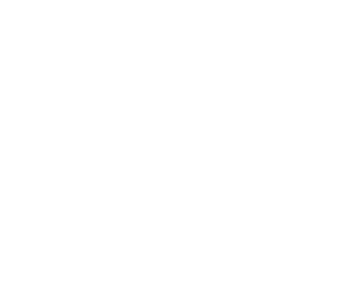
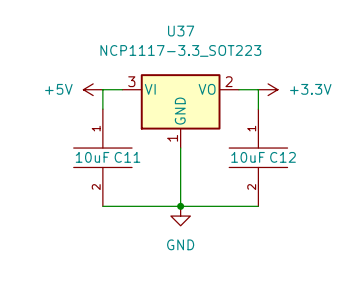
power symbol: none -> +5V (93, 89)
wire: none -> (122, 89) (102, 89) (102, 109)
wire: none -> (238, 89) (258, 89) (258, 109)
power symbol: none -> +3.3V (268, 89)
U37: none -> NCP1117-3.3_SOT223 (180, 111)
wire: none -> (180, 148) (180, 206)
C11: none -> 10uF (102, 157)
C12: none -> 10uF (258, 157)
wire: none -> (102, 206) (258, 206)
junction: none -> (180, 206)
power symbol: none -> GND (180, 216)

